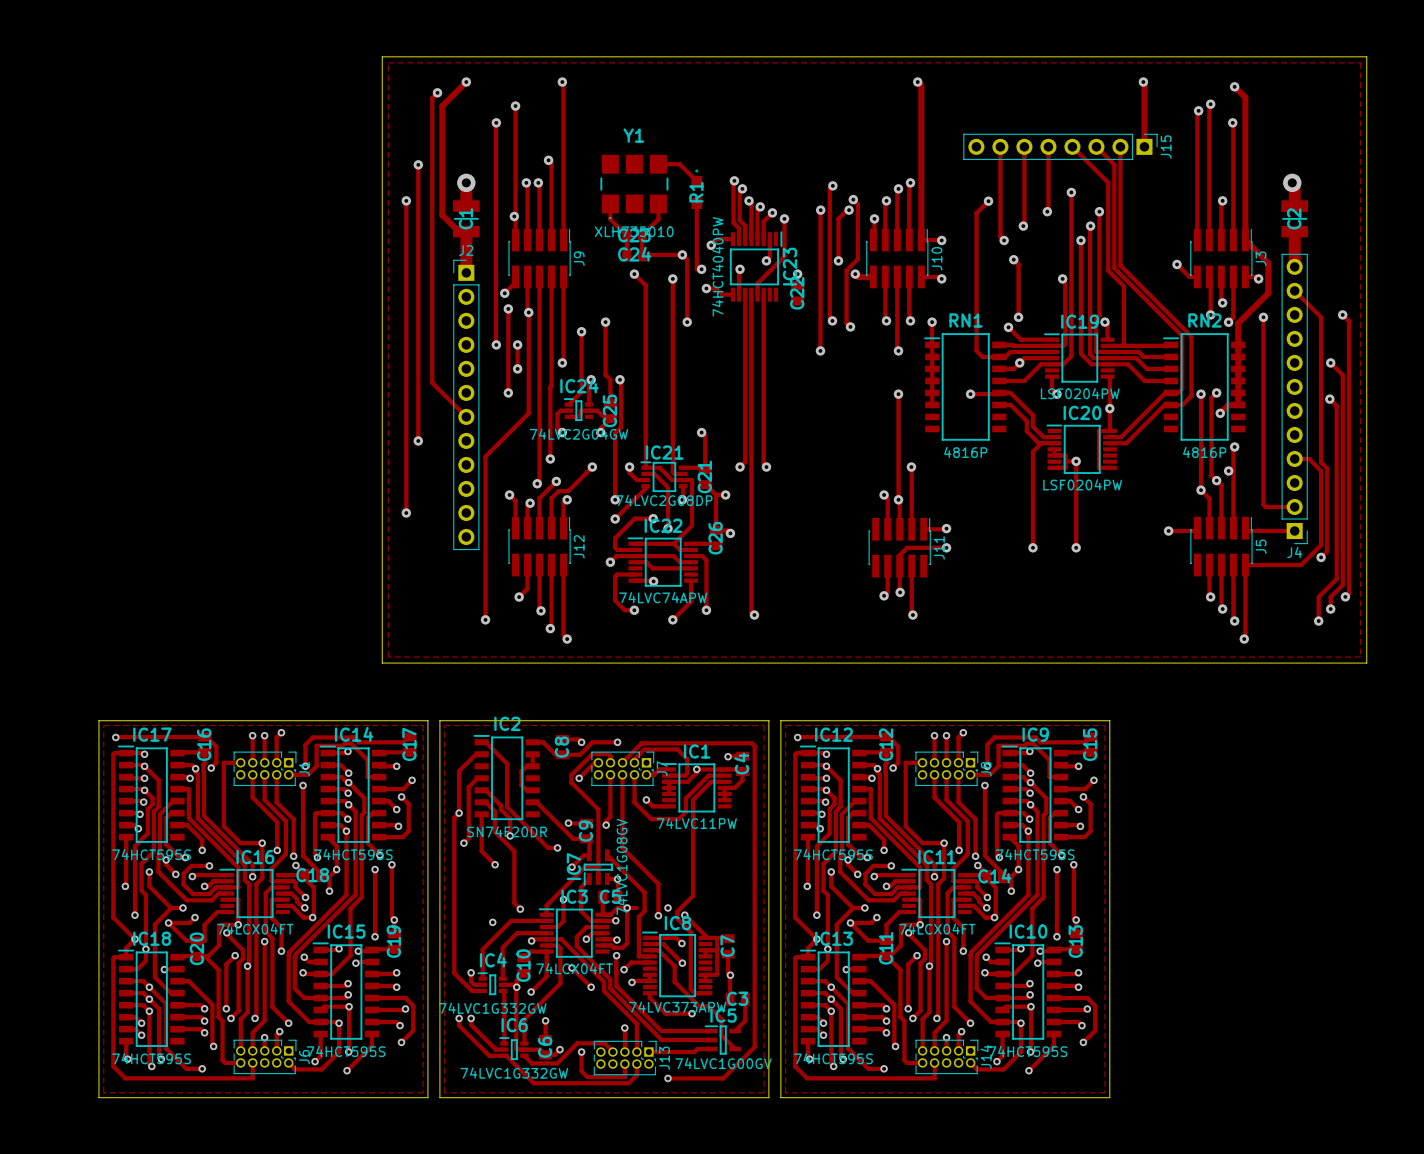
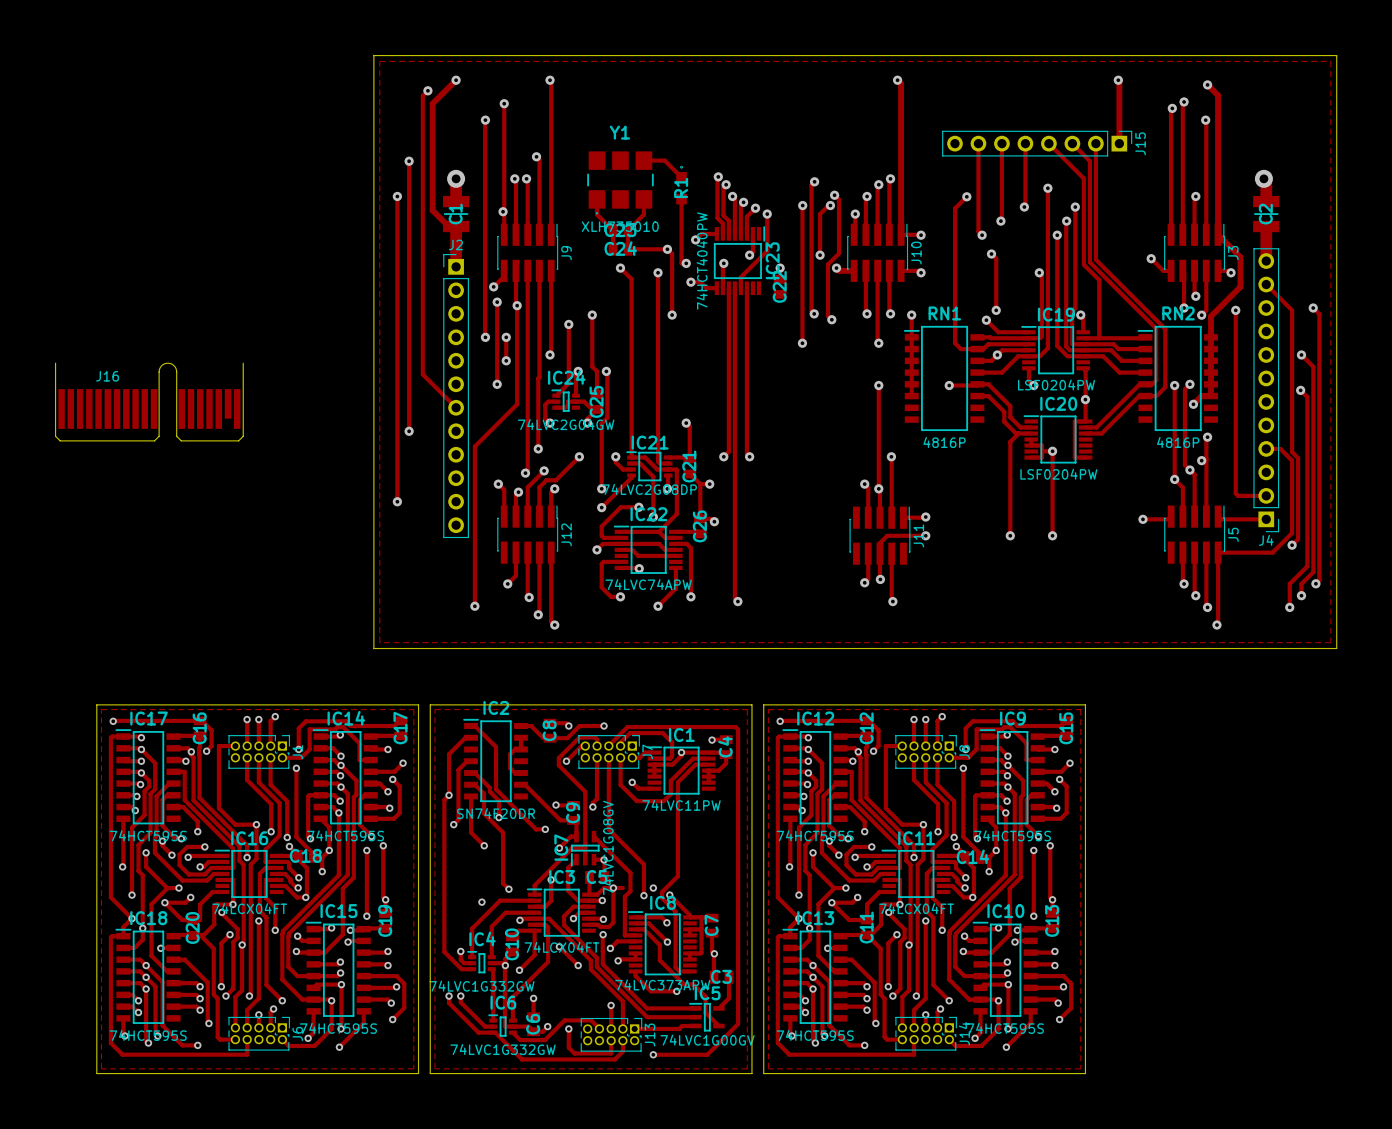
J16: none -> (149, 402)

